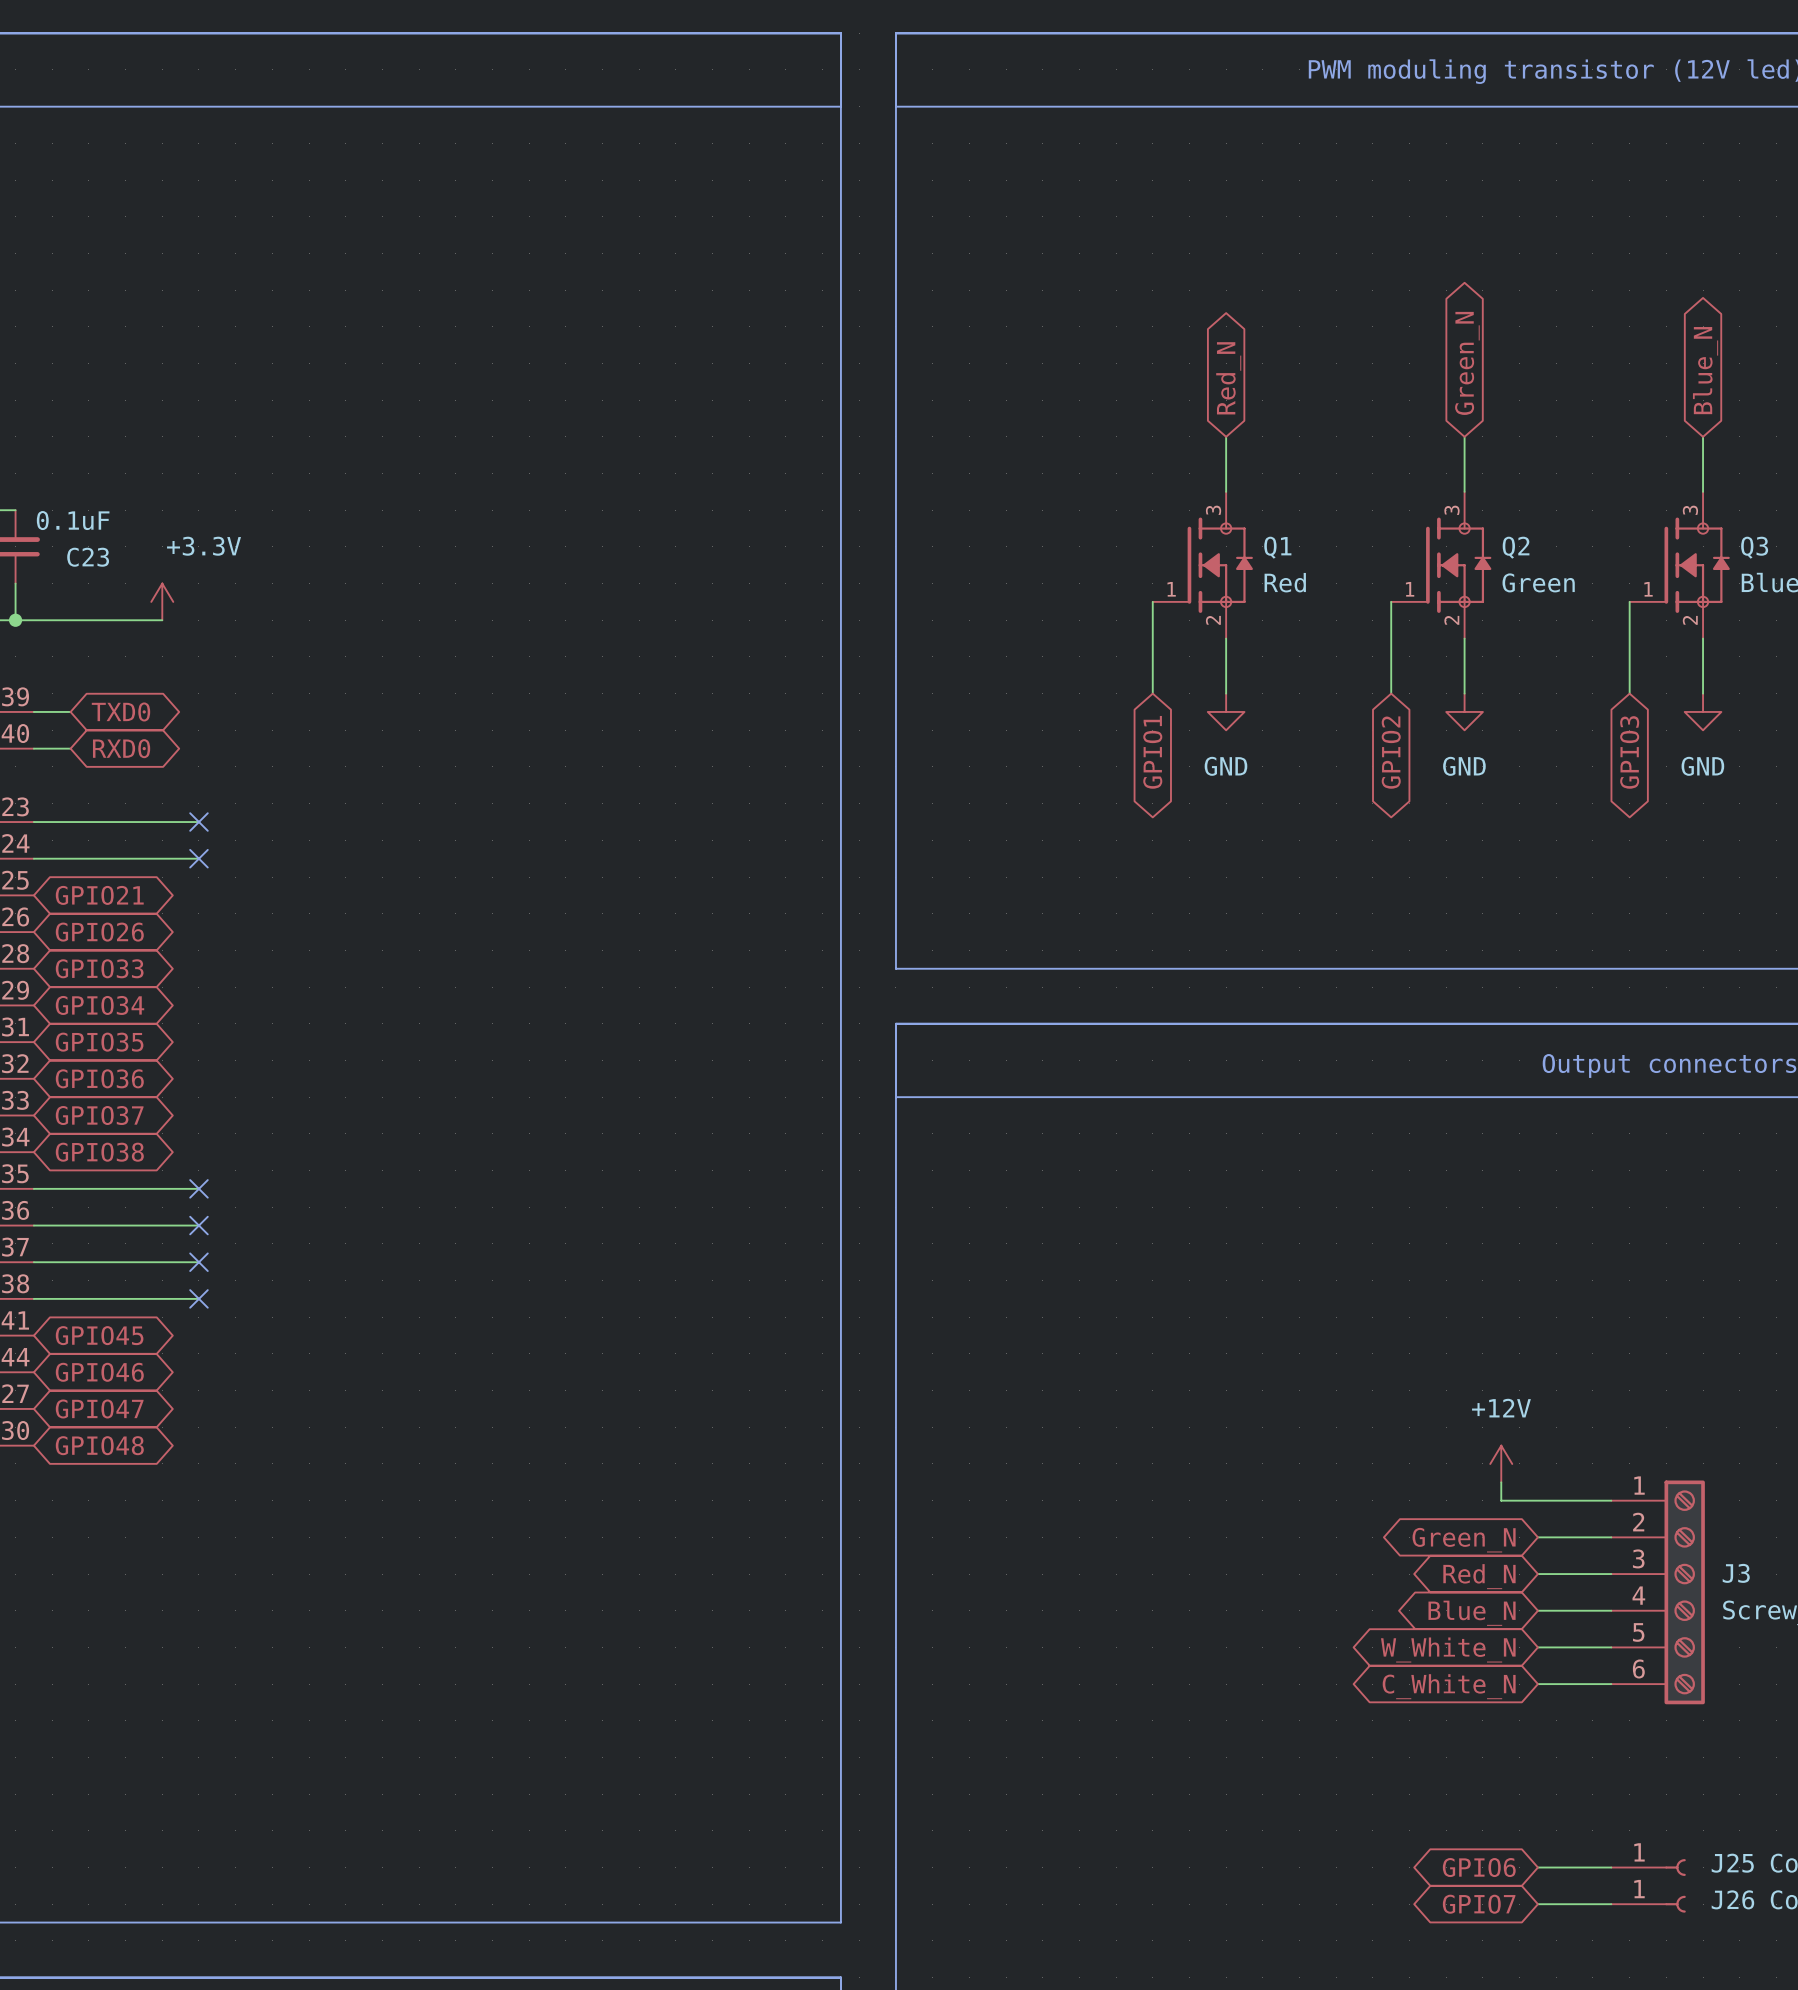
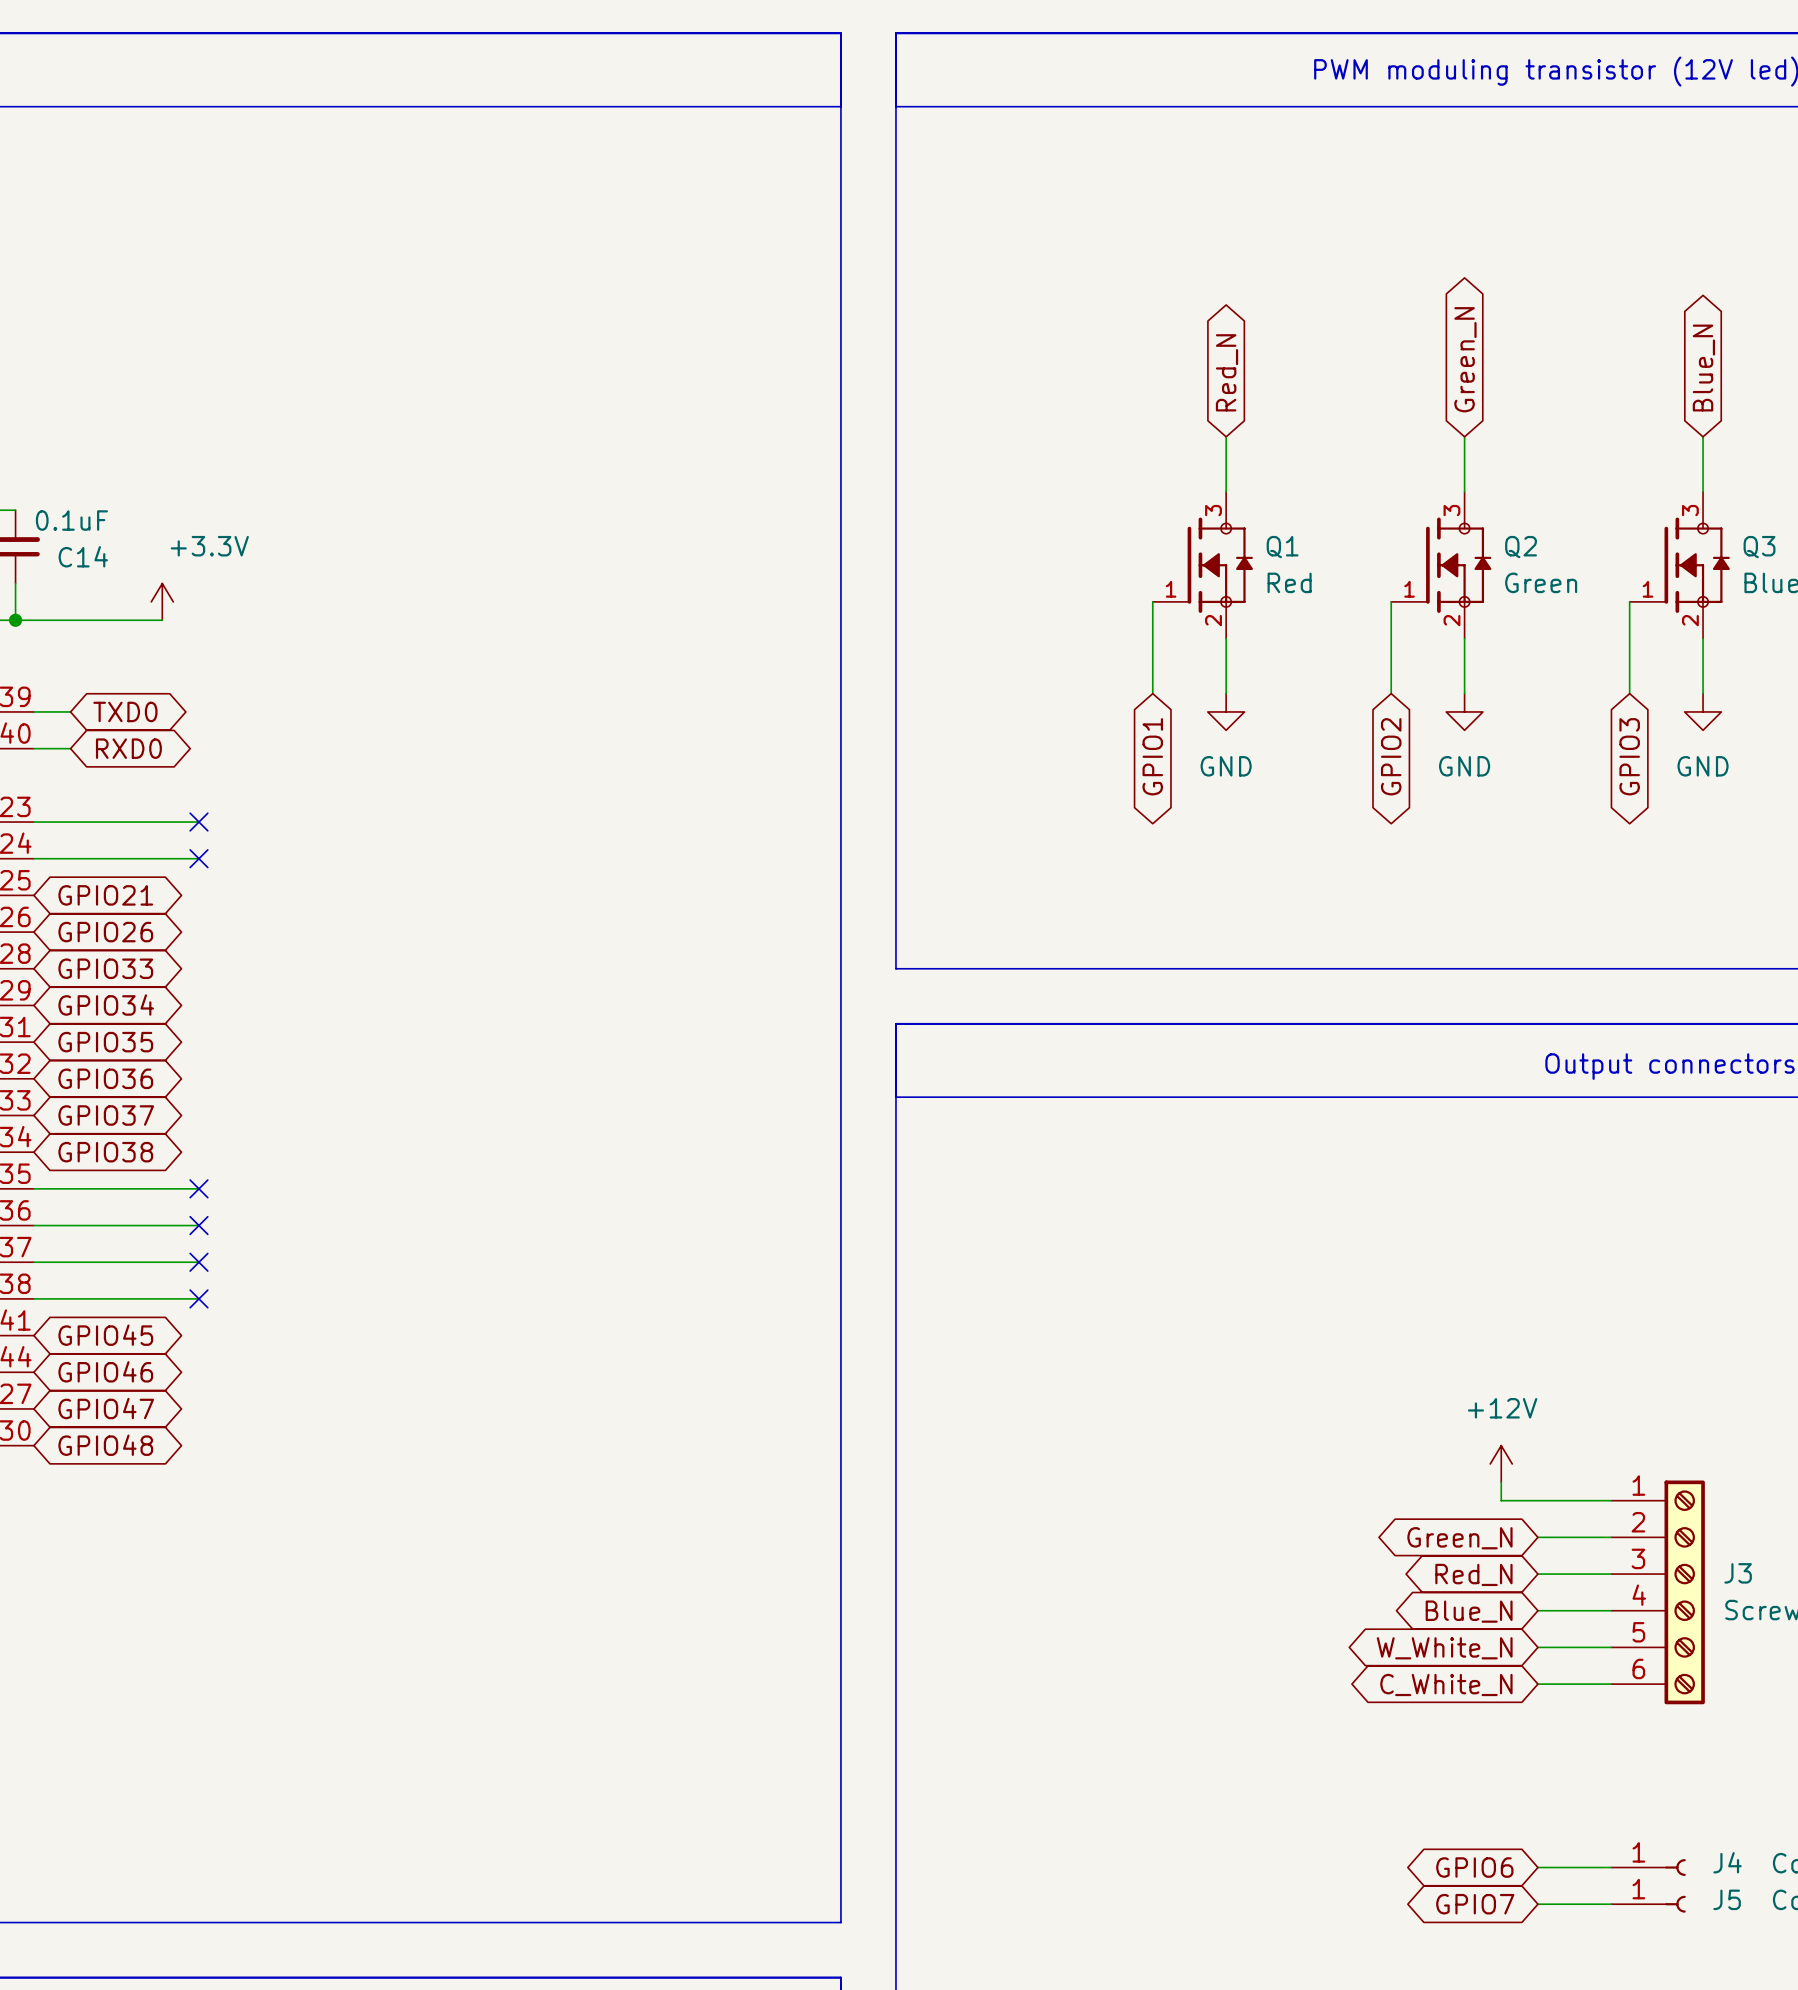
C23 name: C23 (88, 557) -> C14 (83, 556)
J25 name: J25 (1732, 1863) -> J4 (1727, 1862)
J26 name: J26 (1732, 1899) -> J5 (1727, 1899)

